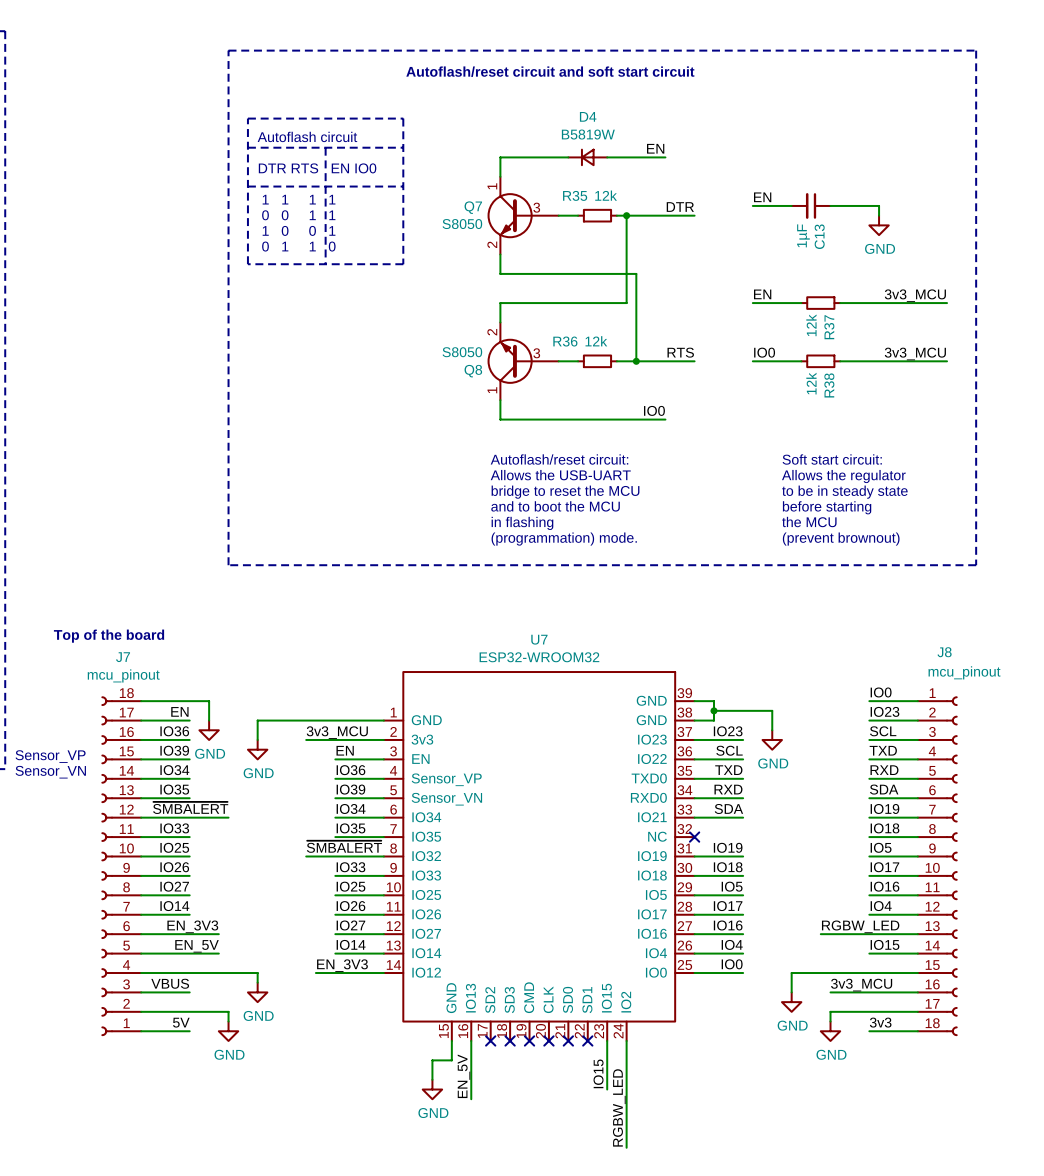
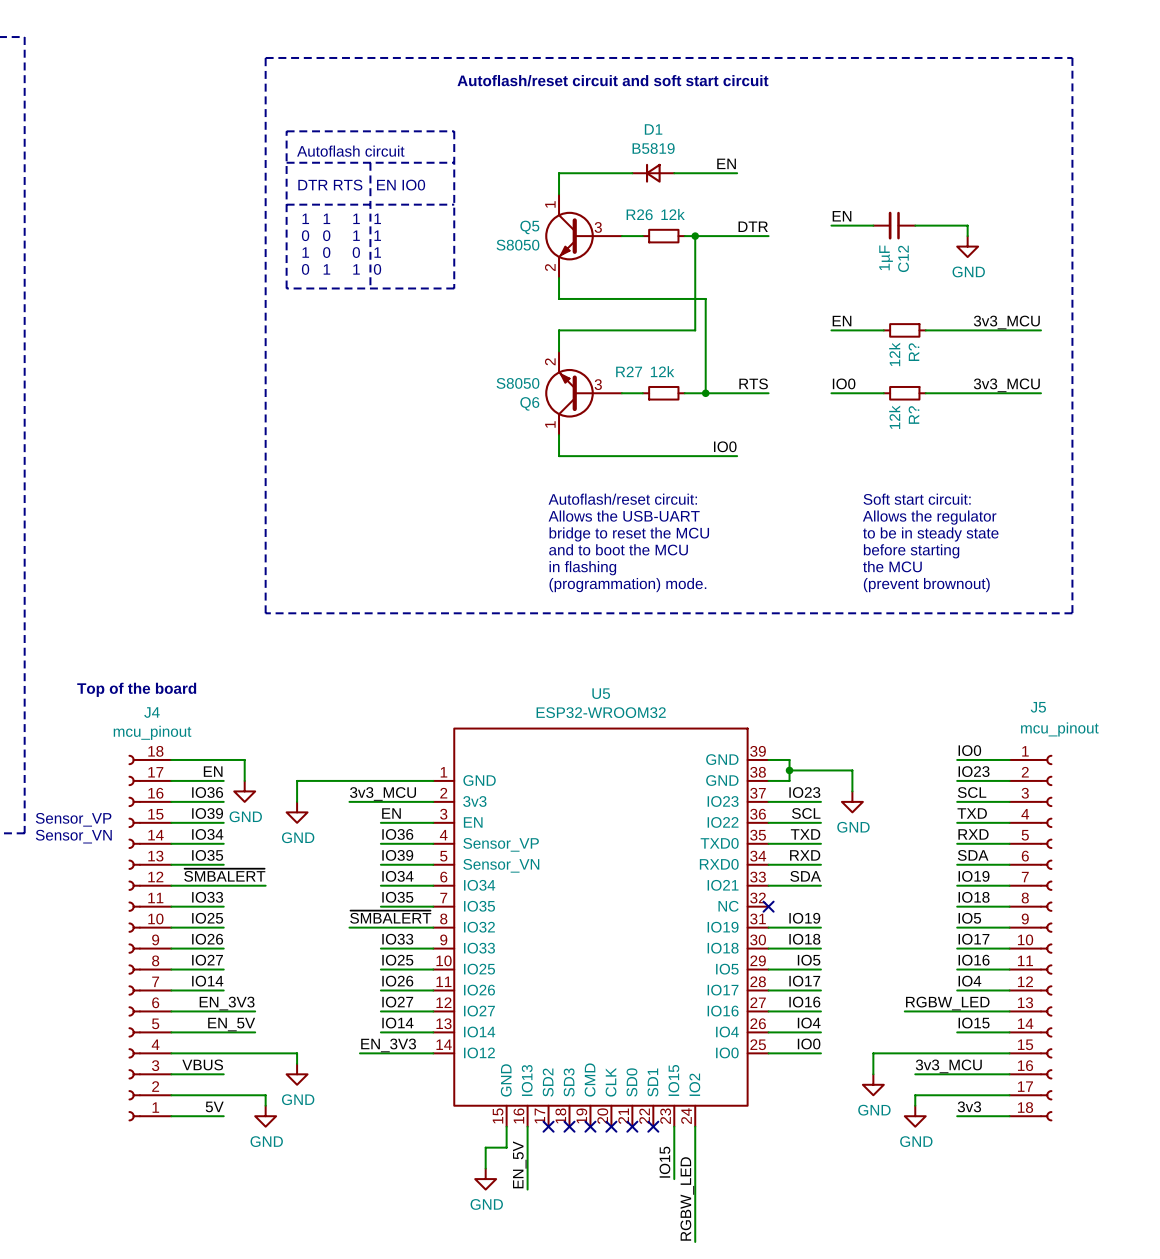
D4 name: D4 (588, 116) -> D1 (653, 129)
D4 value: B5819W (588, 134) -> B5819 (653, 148)
R35 name: R35 (575, 195) -> R26 (639, 214)
Q7 name: Q7 (473, 207) -> Q5 (529, 227)
C13 name: C13 (819, 236) -> C12 (903, 258)
R37 name: R37 (829, 327) -> R? (913, 352)
R36 name: R36 (565, 341) -> R27 (629, 371)
Q8 name: Q8 (473, 371) -> Q6 (529, 403)
R38 name: R38 (829, 385) -> R? (913, 415)
U7 name: U7 (539, 639) -> U5 (601, 693)
J8 name: J8 (944, 652) -> J5 (1038, 707)
J7 name: J7 (123, 657) -> J4 (151, 712)

